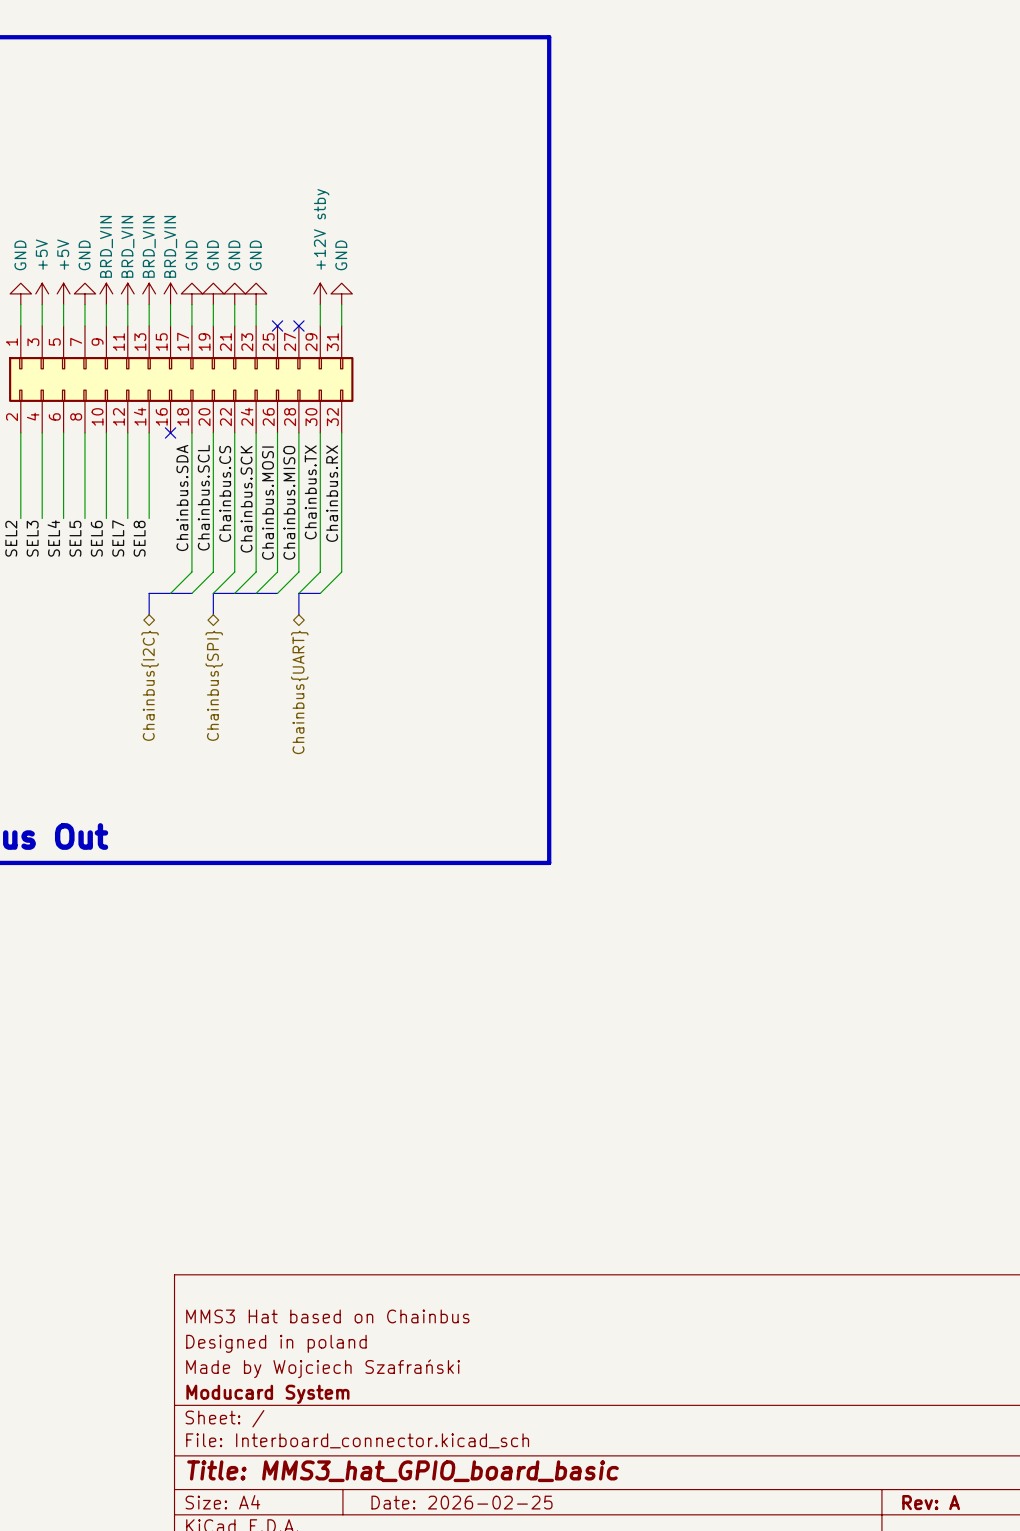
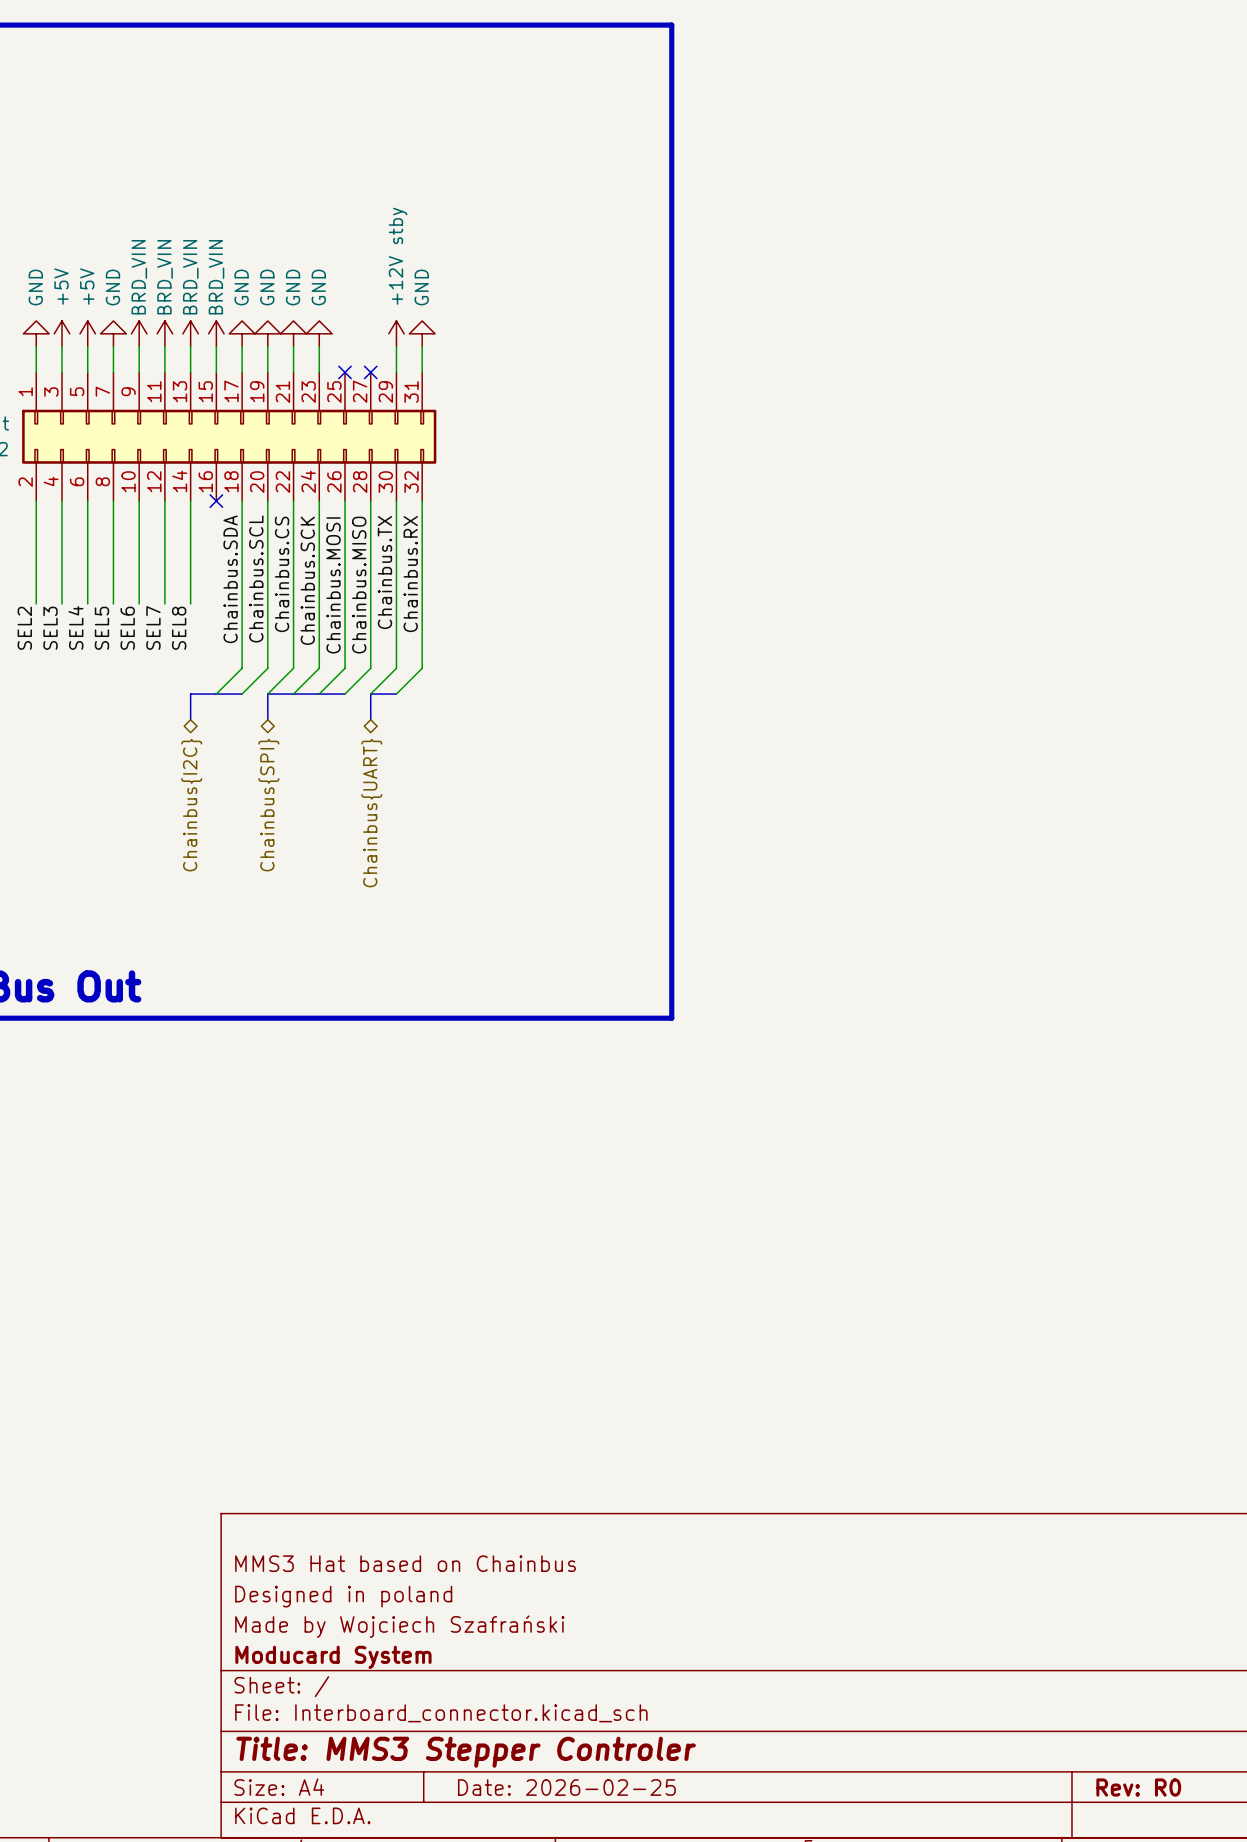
title block: Title: MMS3_hat_GPIO_board_basic (403, 1471) -> Title: MMS3 Stepper Controler (466, 1752)
title block: Rev: A (931, 1502) -> Rev: R0 (1138, 1787)

